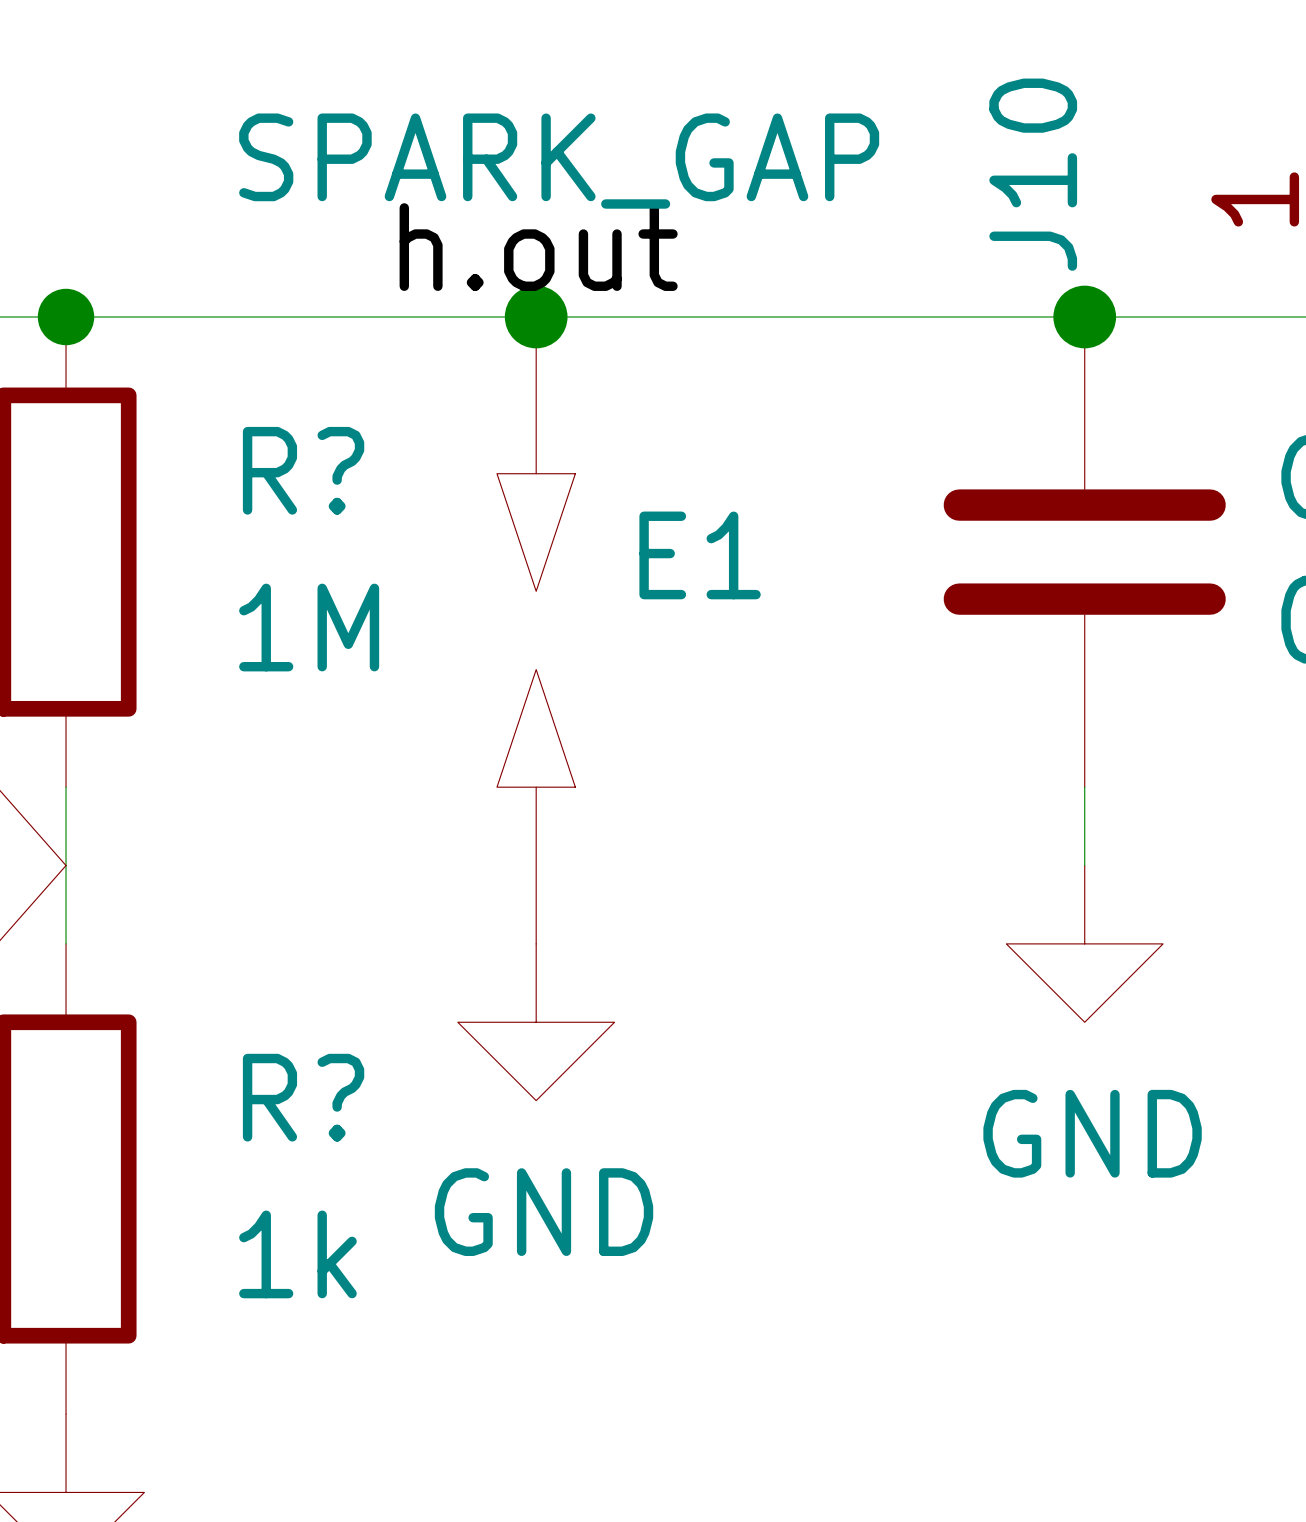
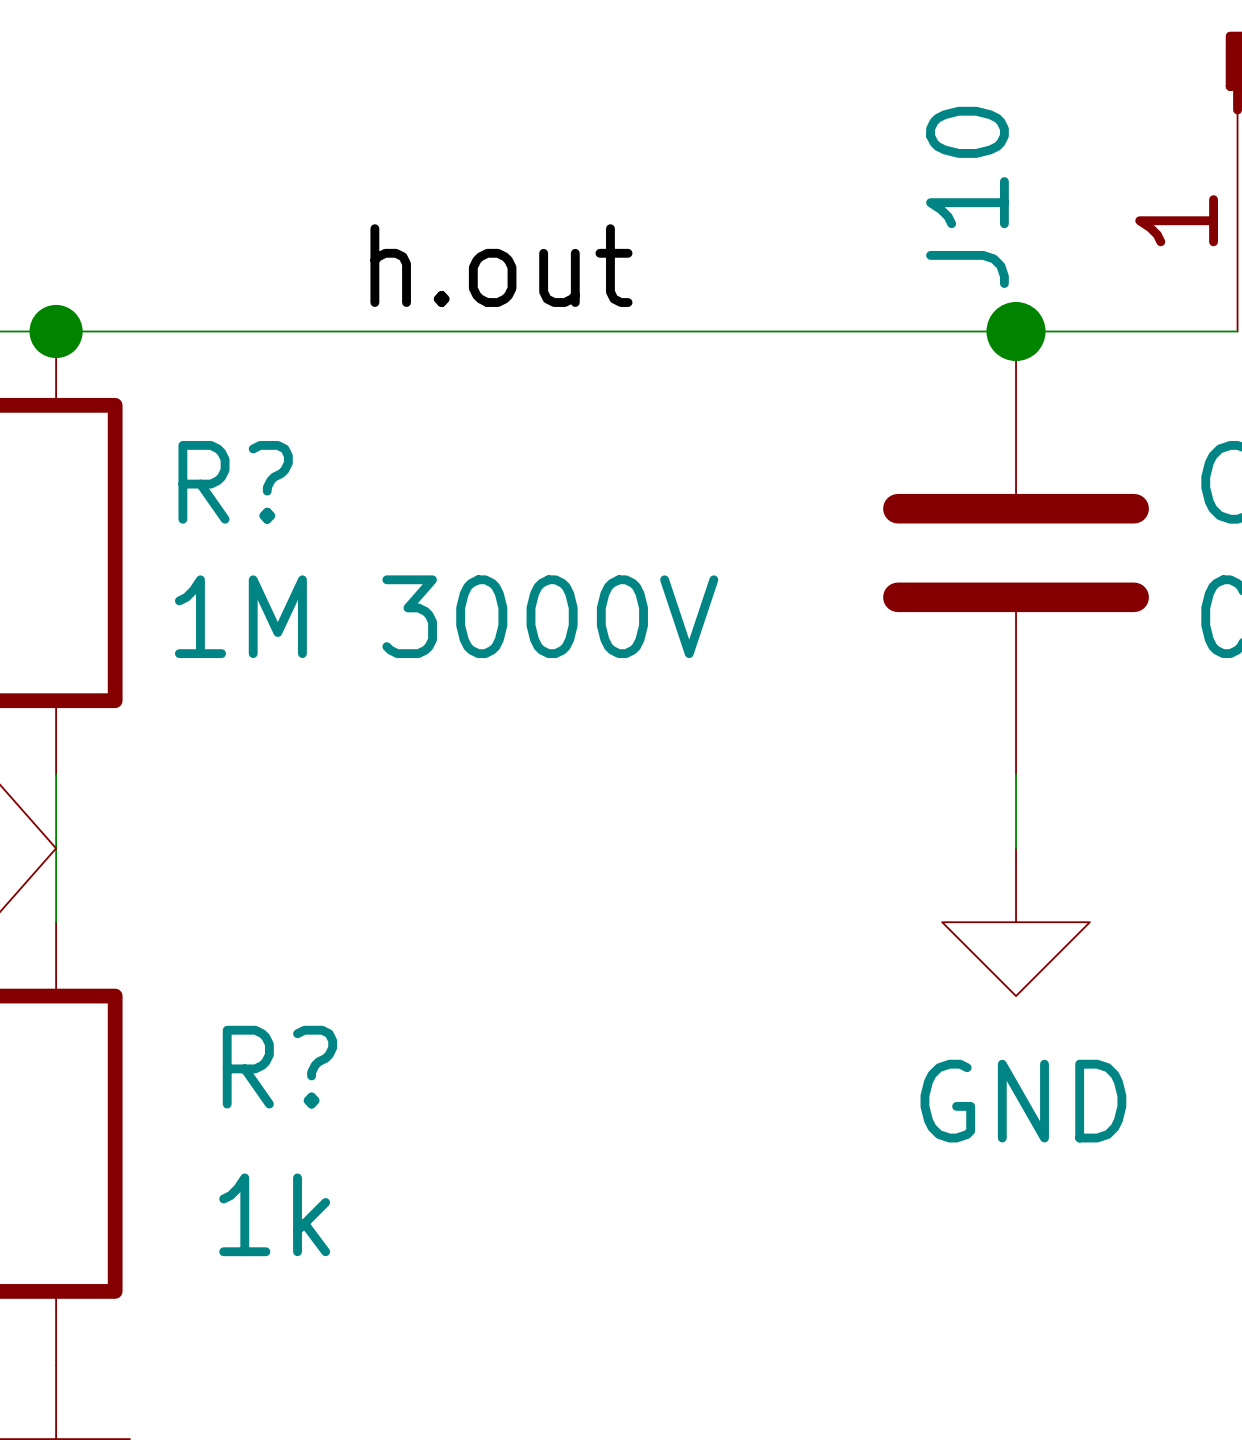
junction: (536, 317) -> none
R? name position: R? (303, 470) -> R? (235, 482)
R? value: 1M (309, 627) -> 1M 3000V (446, 616)
E1: SPARK_GAP (536, 630) -> none
power symbol: GND (536, 1022) -> none

